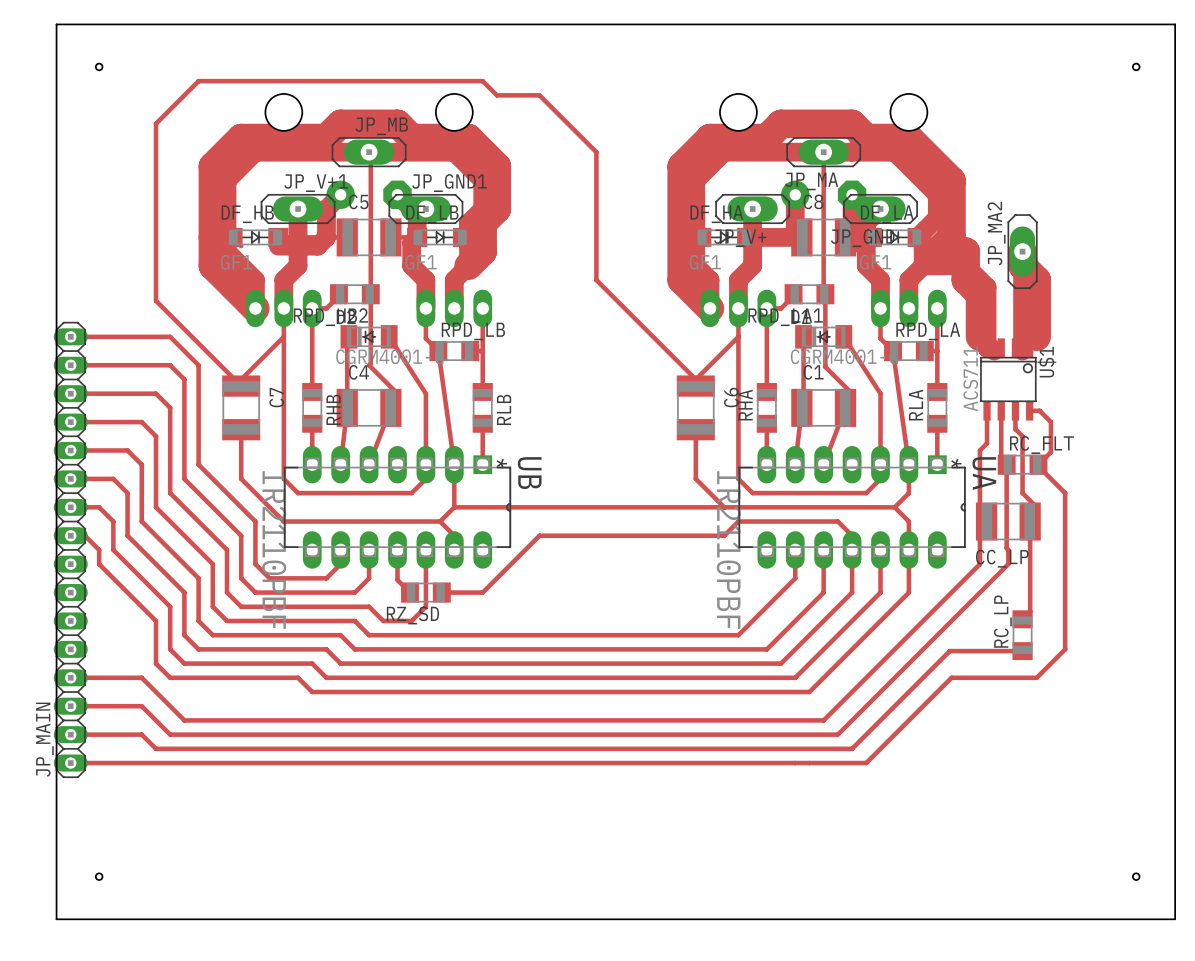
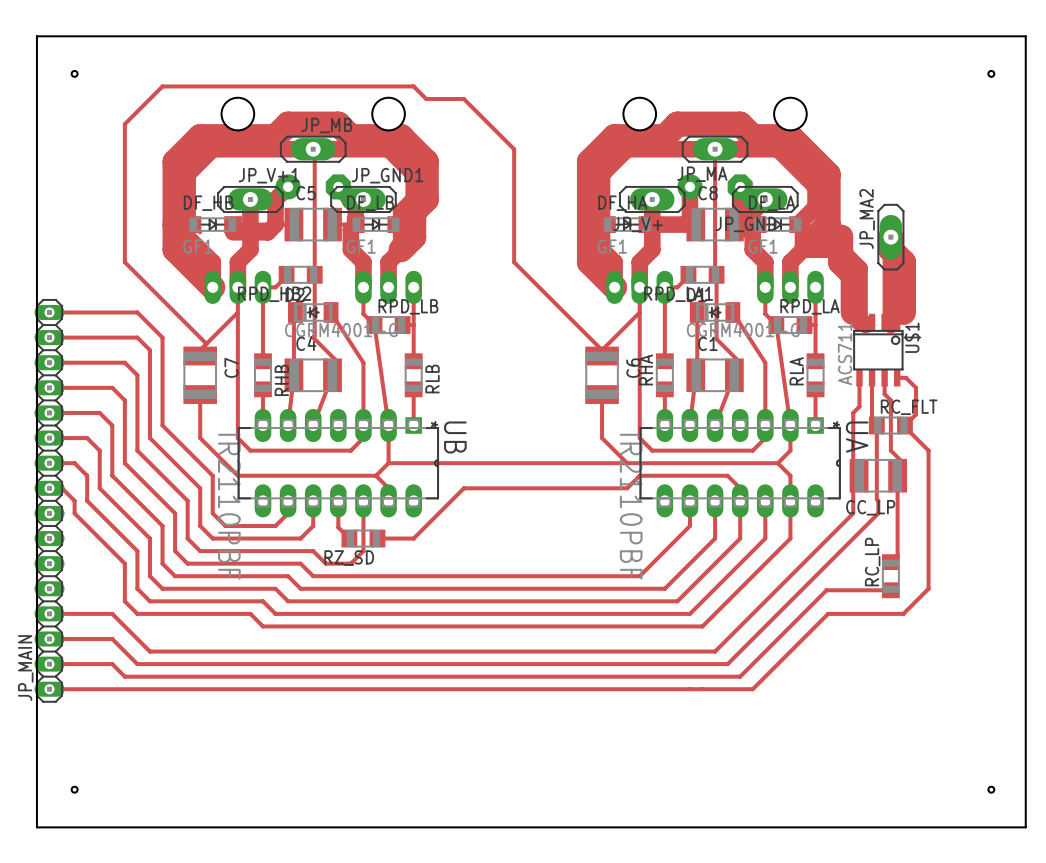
top track: (155, 280) (155, 300) (241, 386) -> (124, 262) (206, 343)

